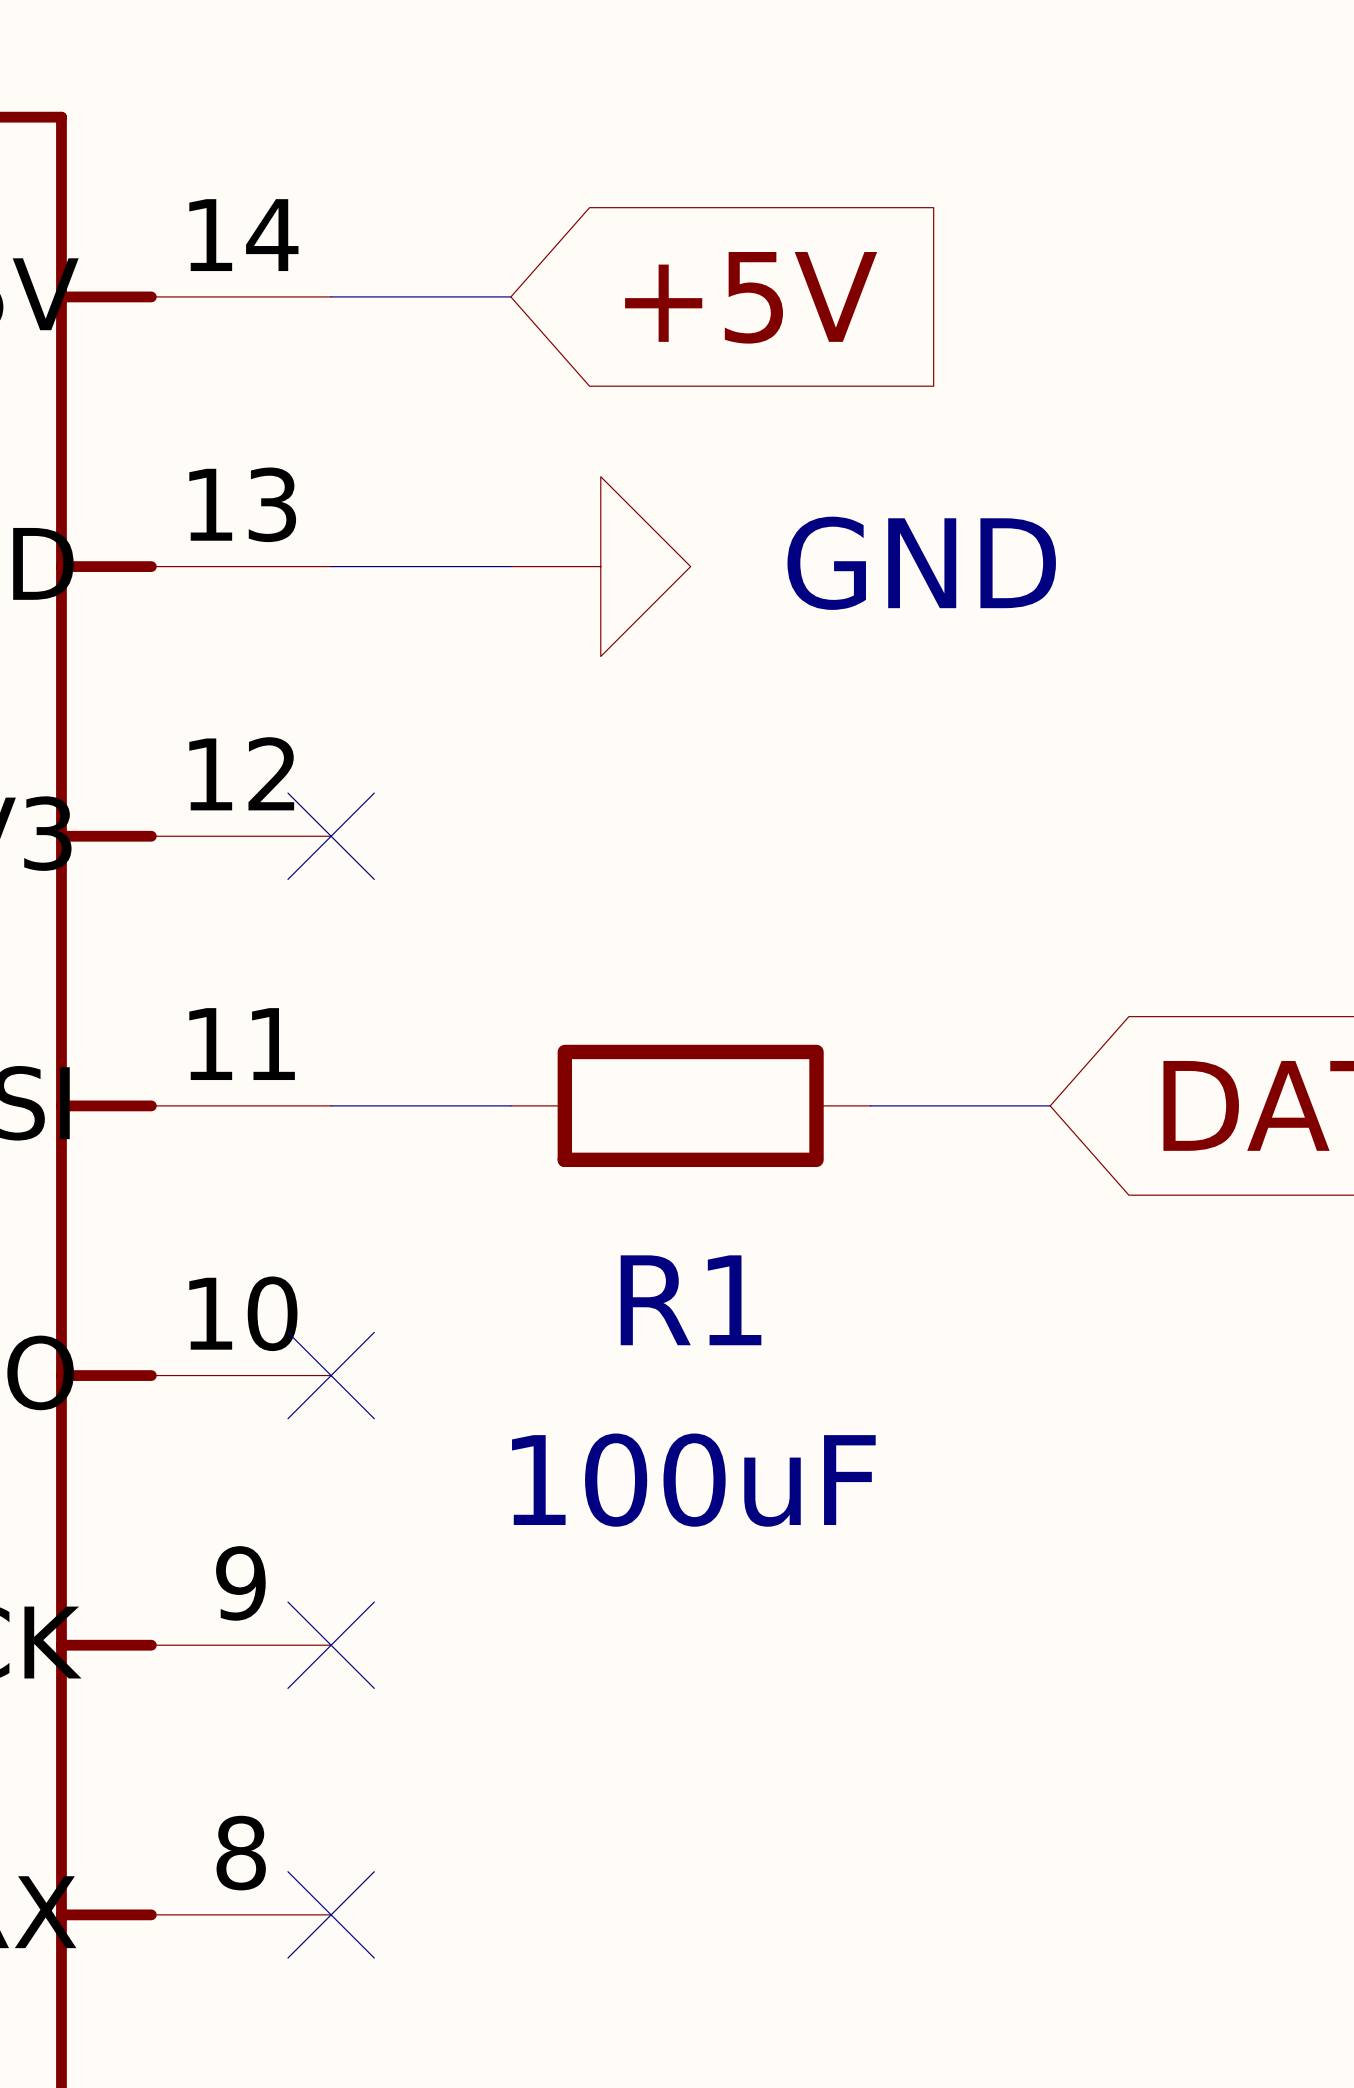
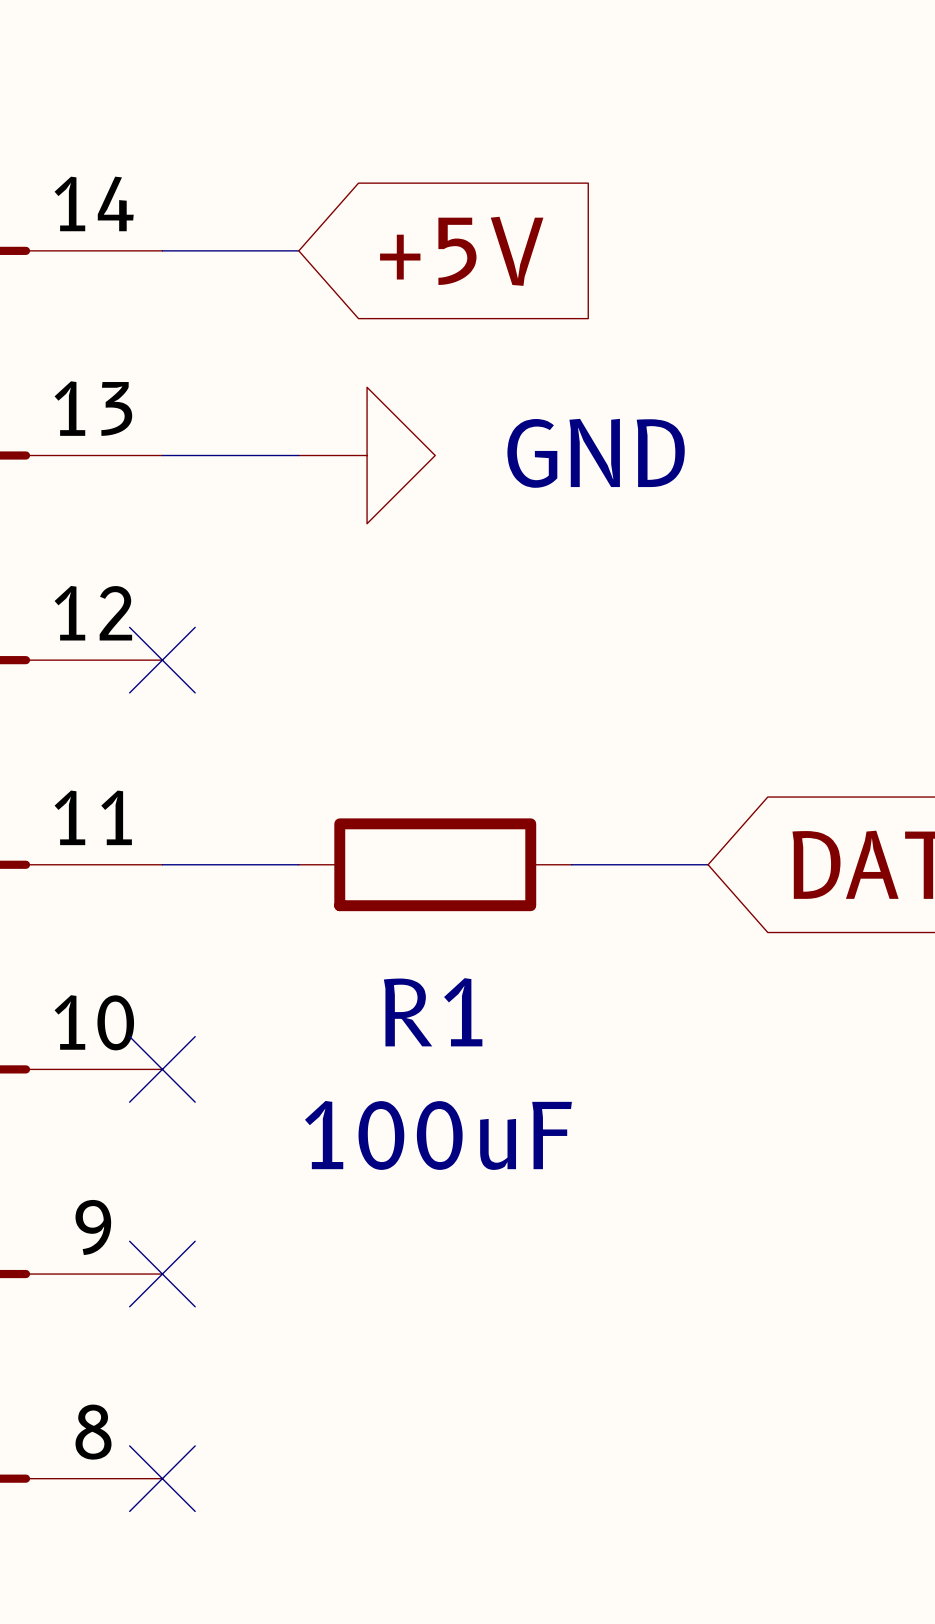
R1 value position: 100uF (693, 1480) -> 100uF (438, 1135)

